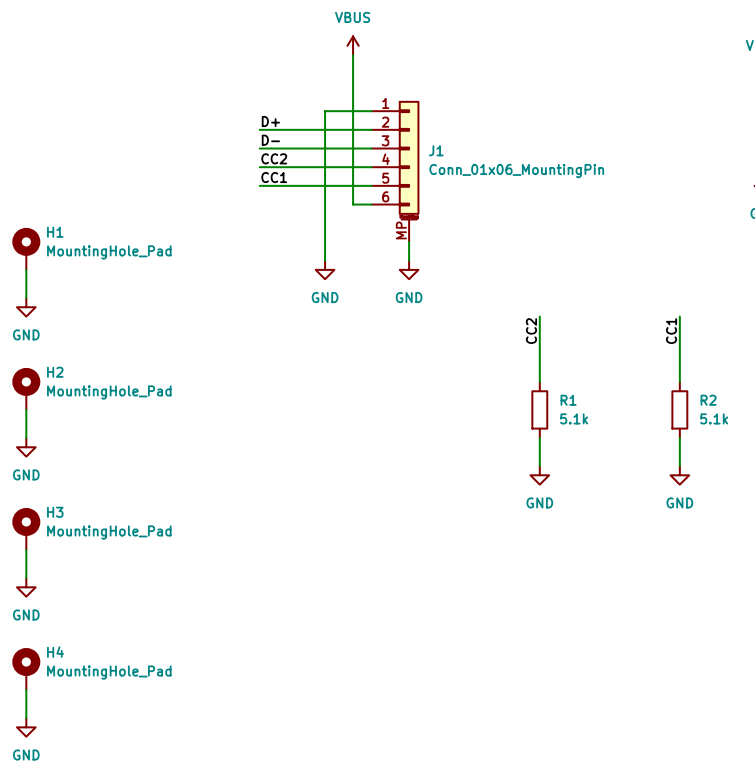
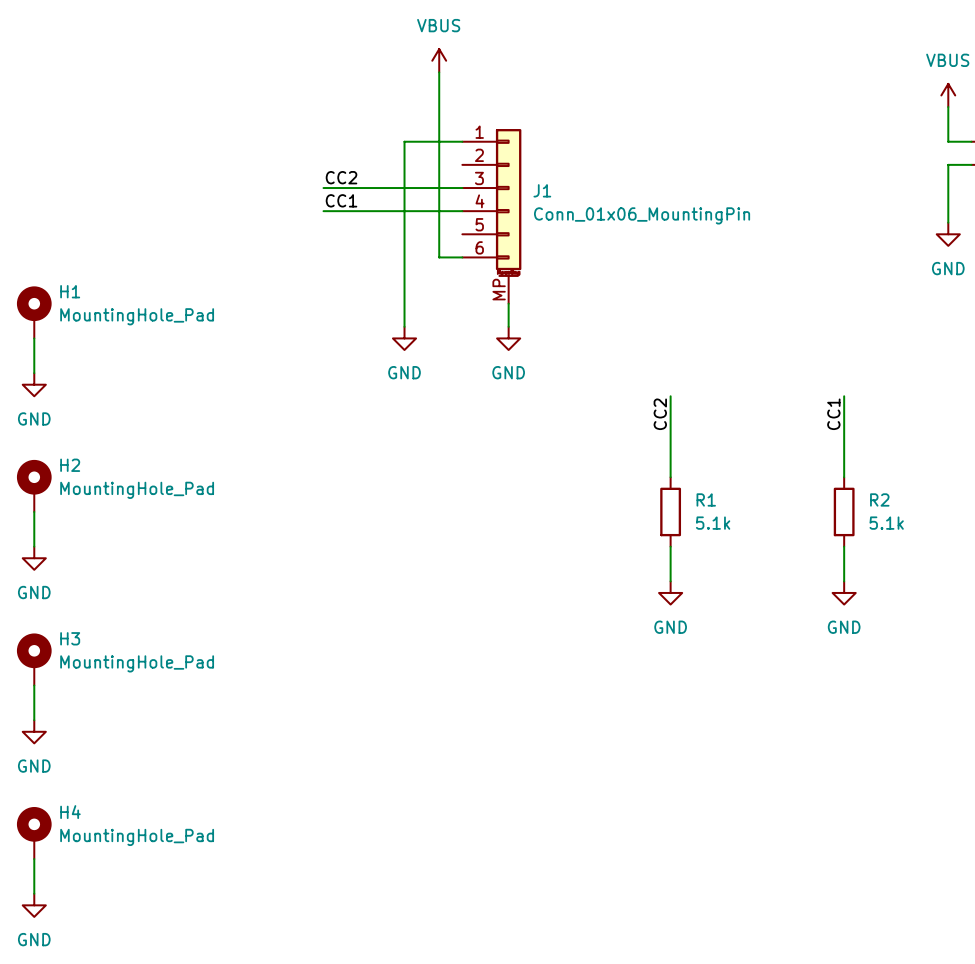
label: D+ (270, 121) -> none
wire: (259, 129) (371, 129) -> none
label: D- (270, 140) -> CC2 (341, 177)
label: CC2 (274, 158) -> CC1 (341, 200)
label: CC1 (274, 177) -> none
wire: (259, 185) (371, 185) -> none

